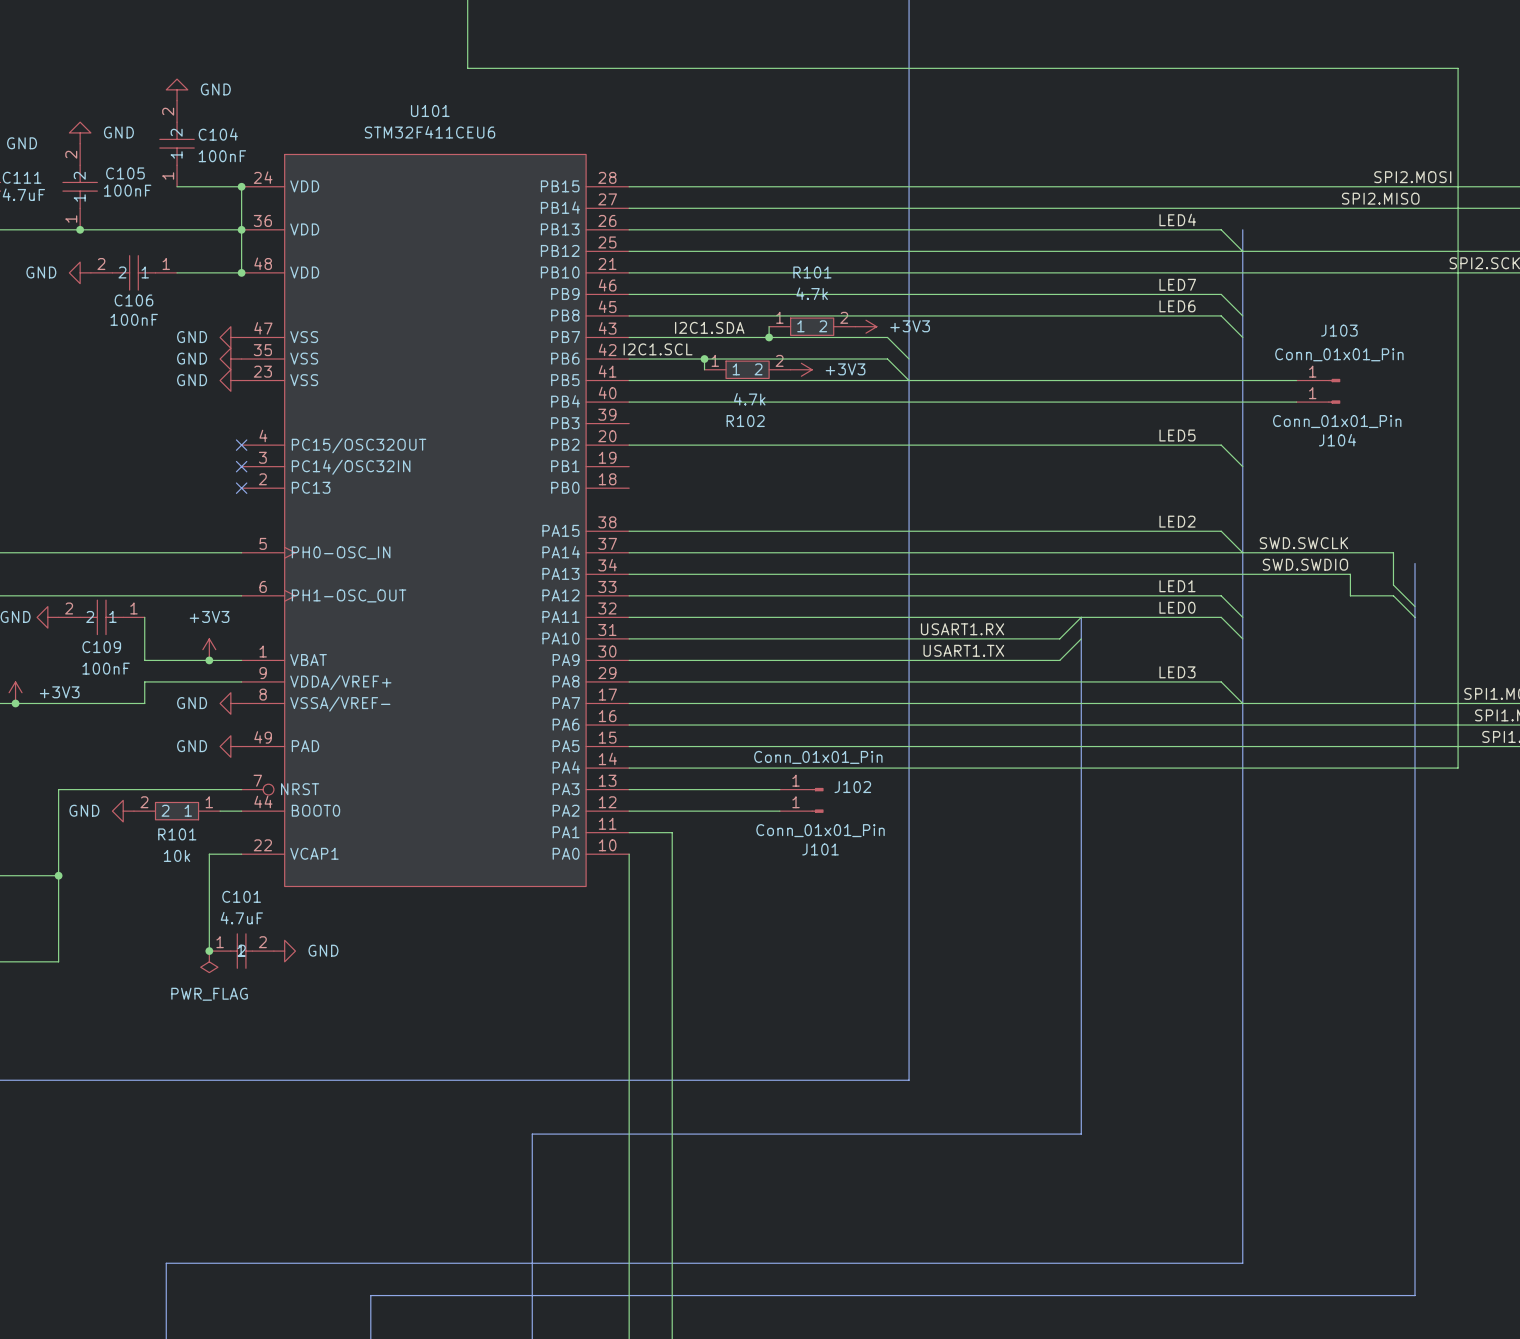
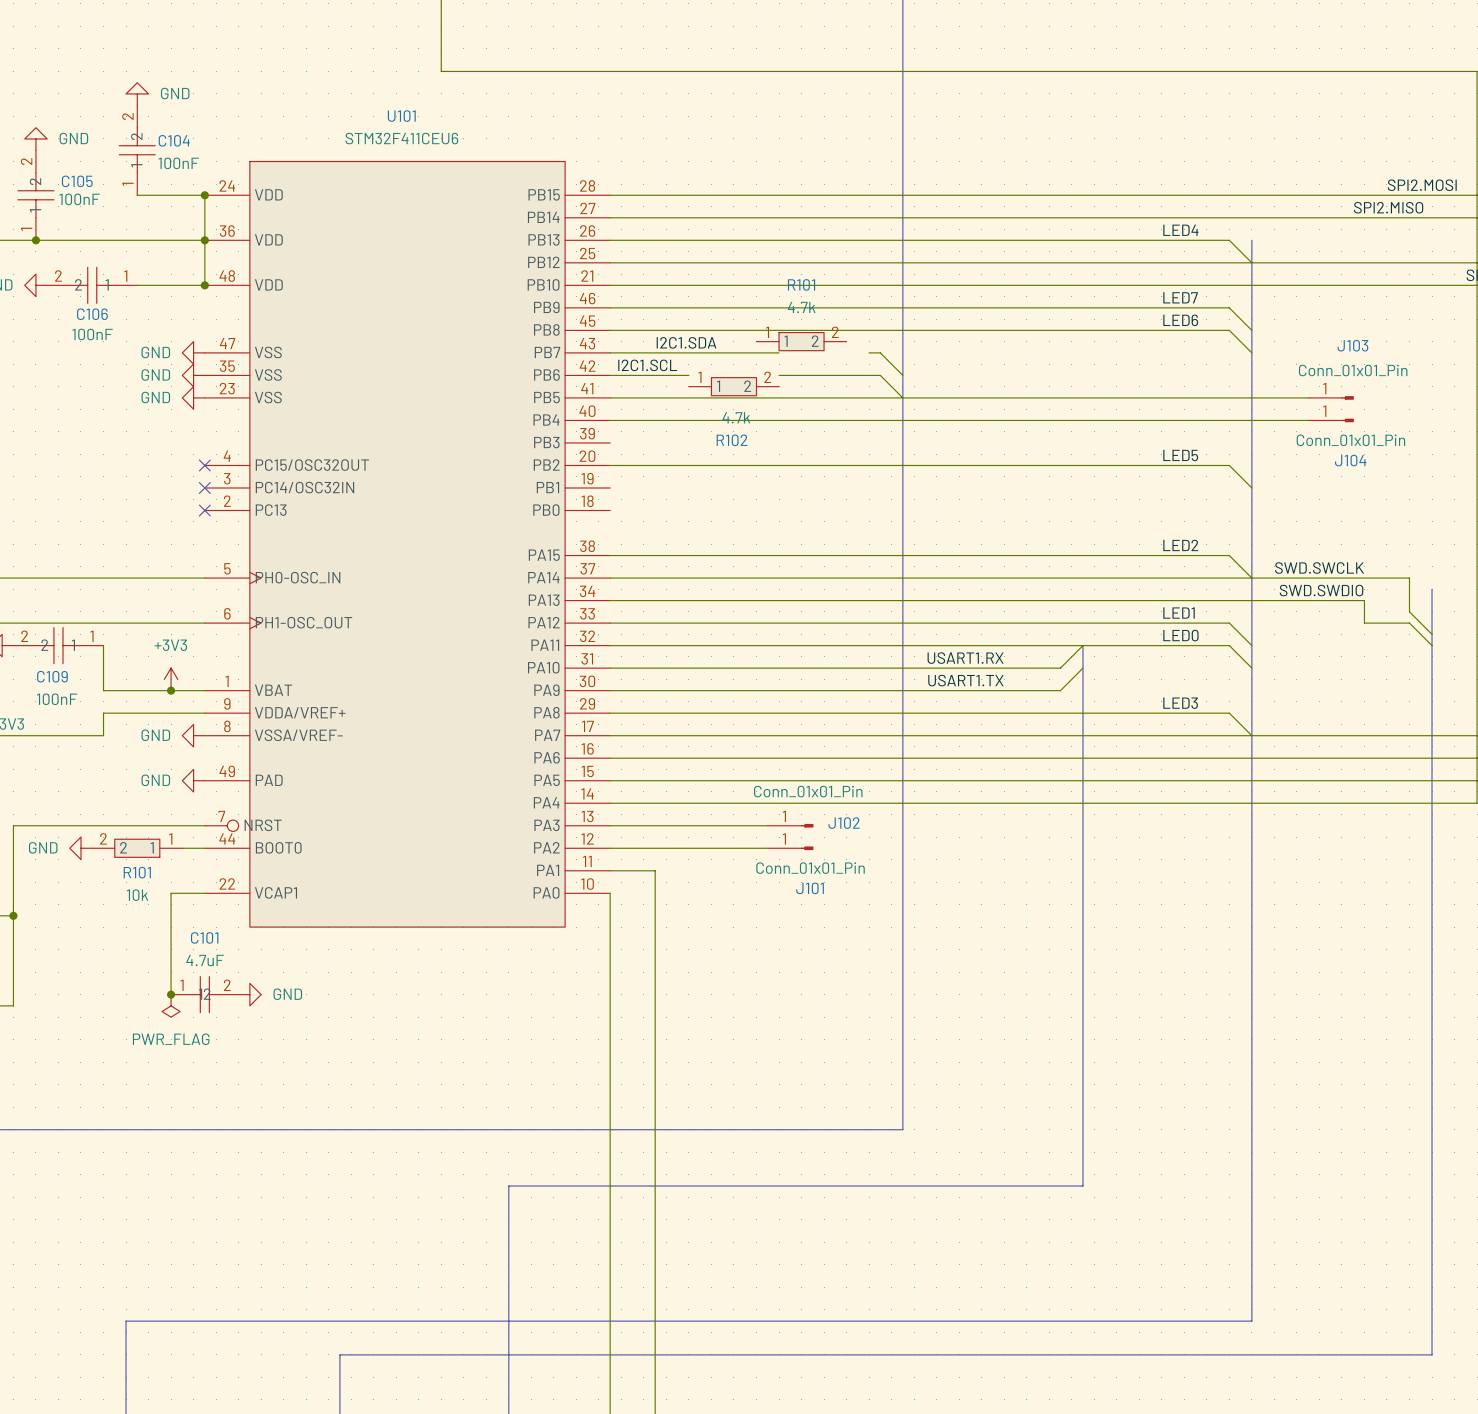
wire: (769, 326) (769, 337) -> none
power symbol: +3V3 (865, 326) -> none
junction: (769, 337) -> none
wire: (790, 337) (876, 337) -> none
junction: (704, 359) -> none
wire: (790, 359) (704, 359) (704, 369) -> none
power symbol: +3V3 (801, 369) -> none

